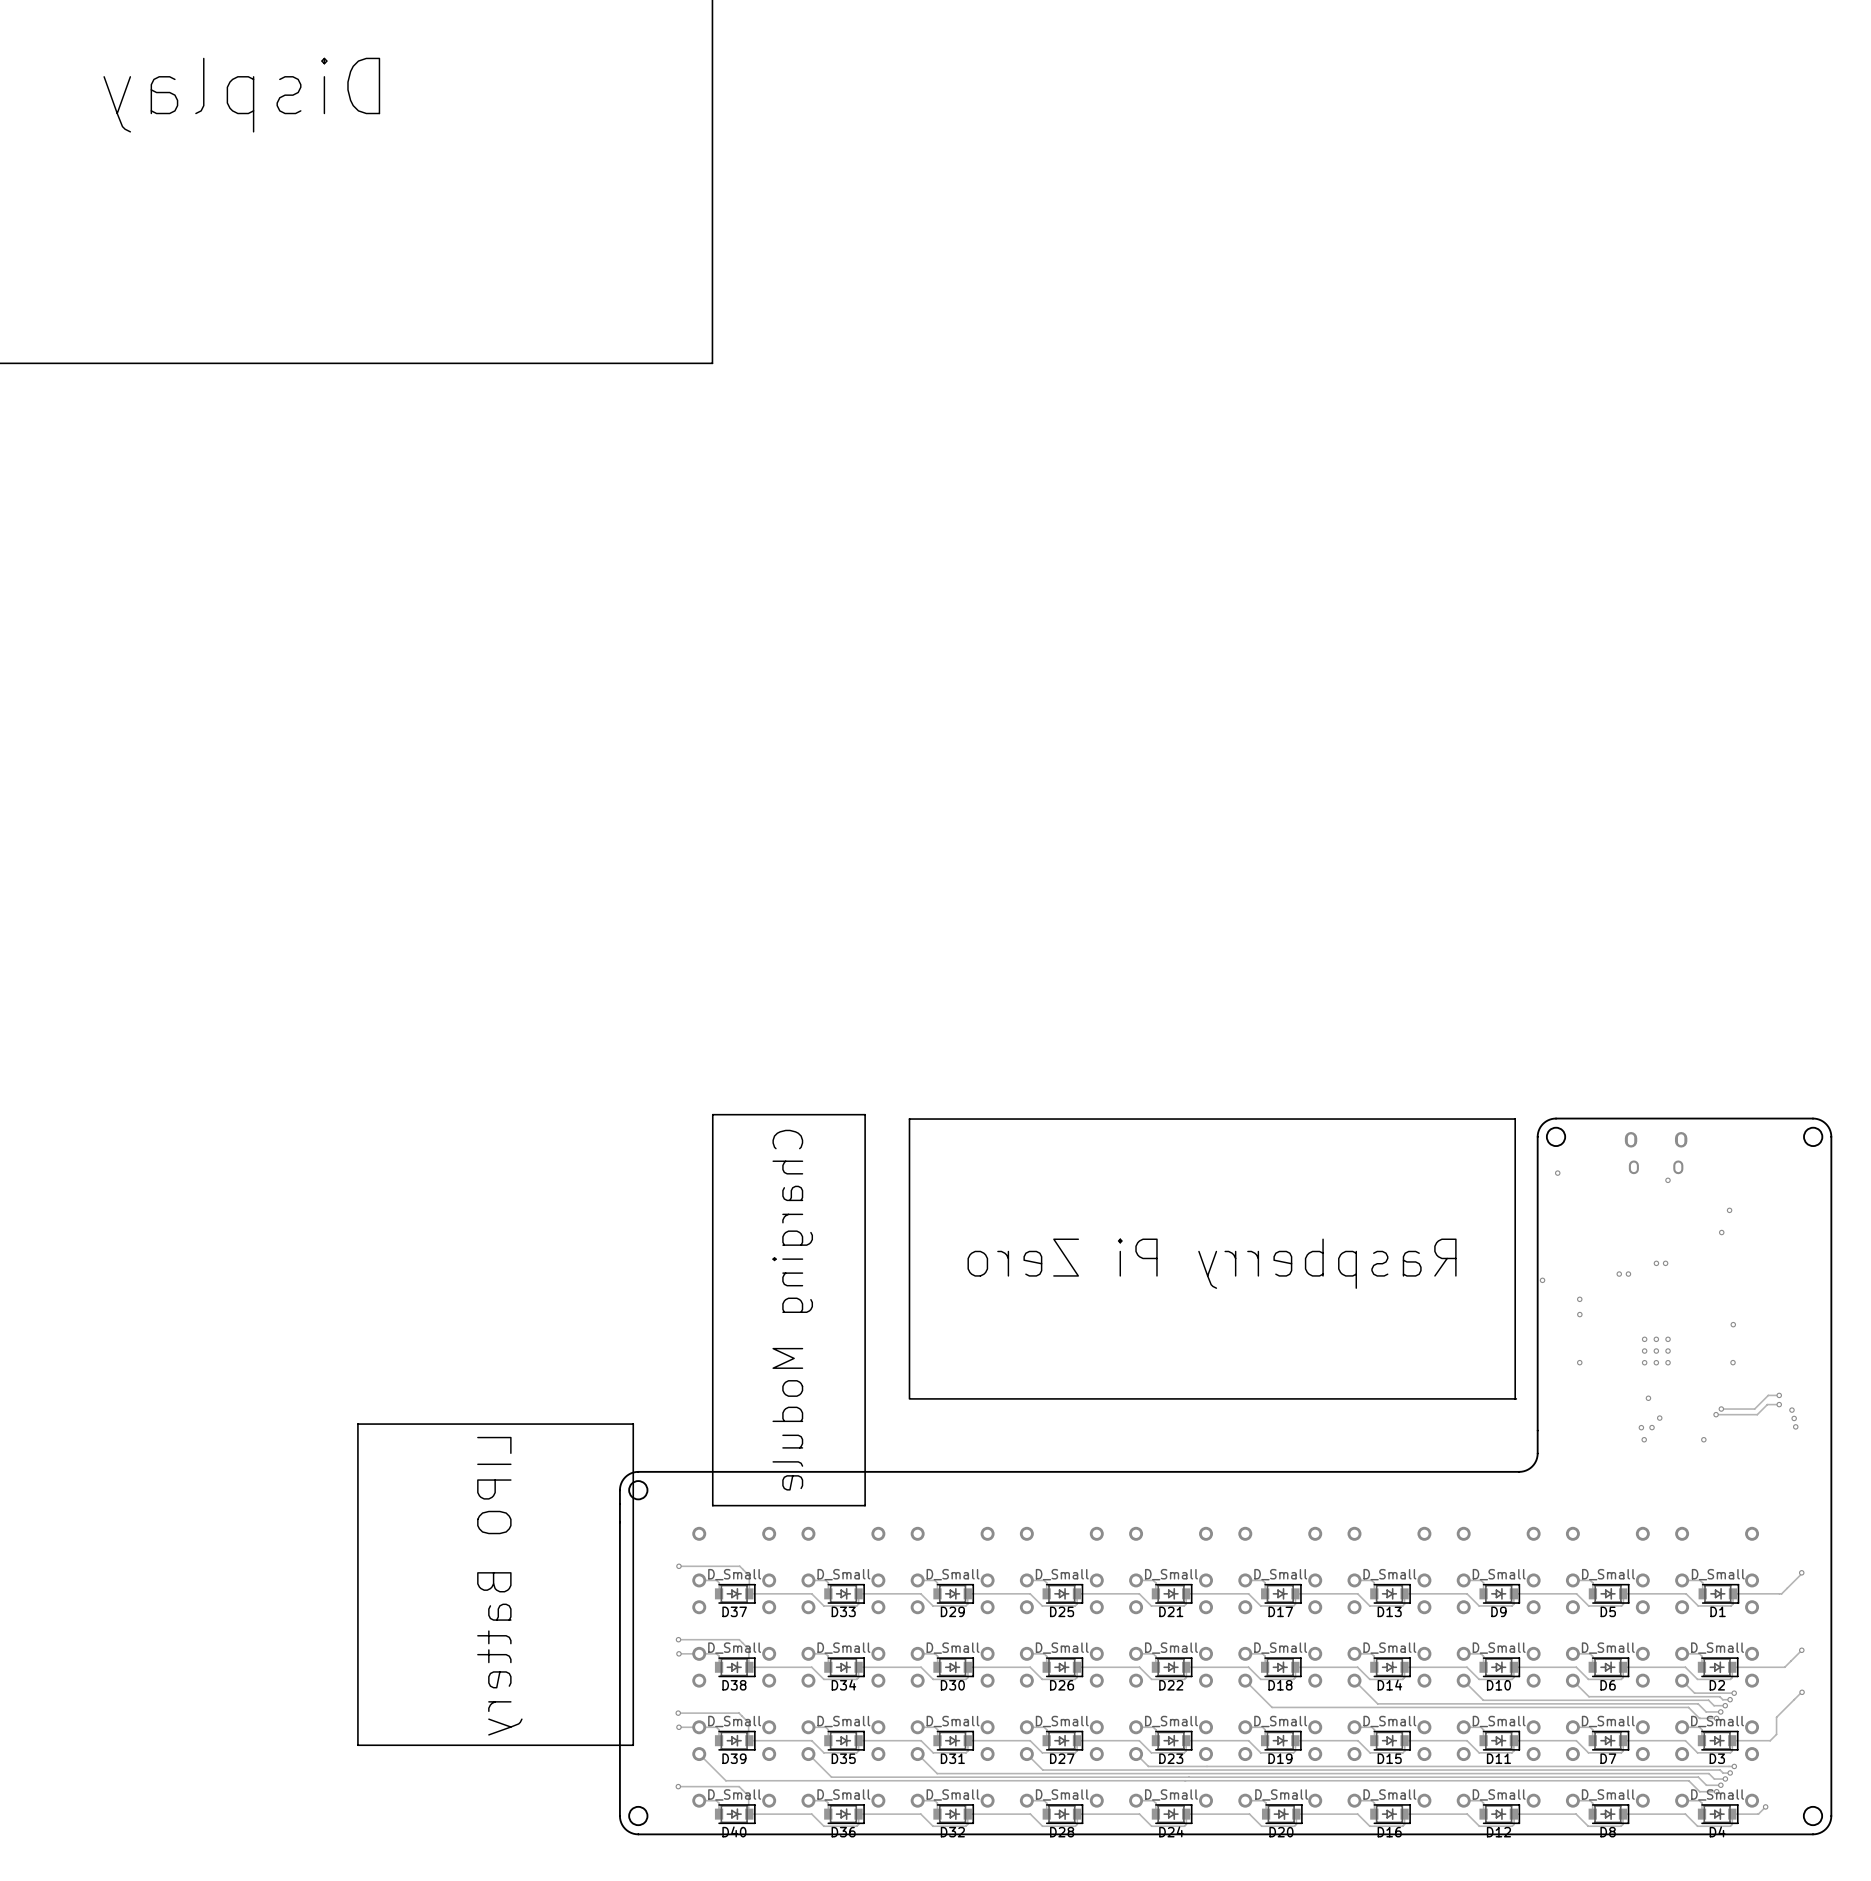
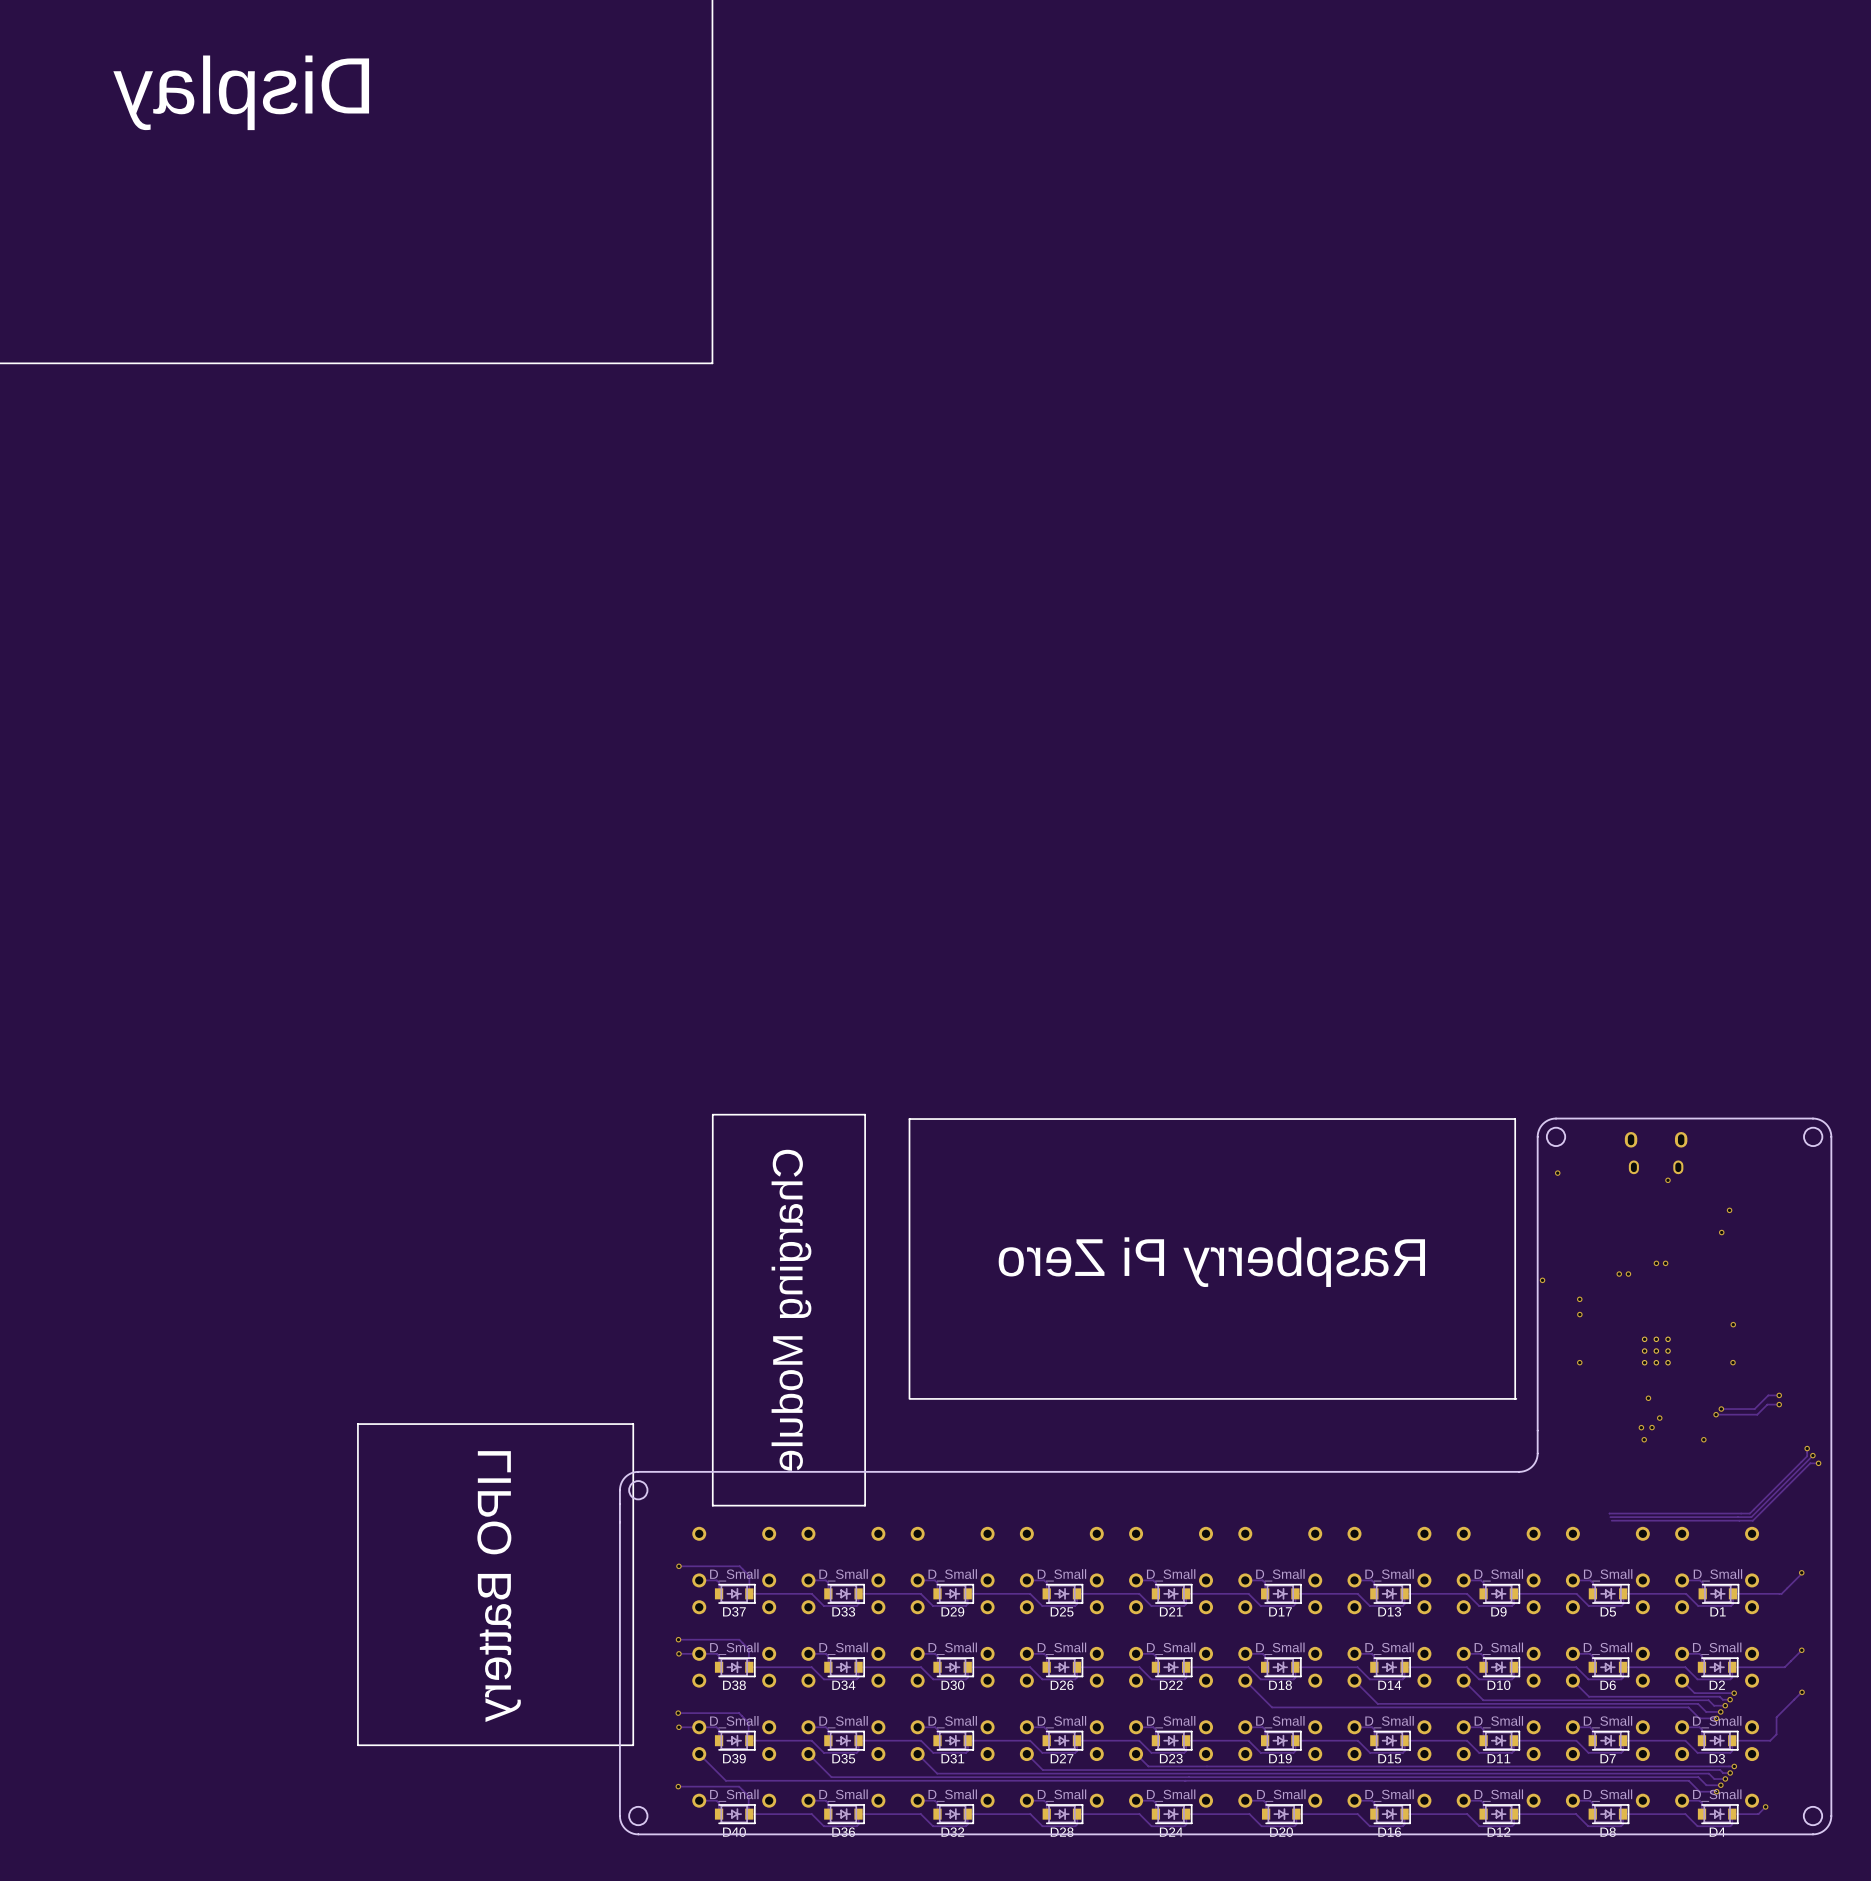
via: (1791, 1410) -> none
via: (1794, 1418) -> none
via: (1795, 1426) -> none
track: none -> (1807, 1448) (1807, 1456) (1749, 1513) (1609, 1513)
via: none -> (1807, 1448)
track: none -> (1812, 1455) (1751, 1517) (1610, 1517)
via: none -> (1812, 1455)
track: none -> (1818, 1463) (1810, 1463) (1752, 1520) (1611, 1520)
via: none -> (1818, 1463)

